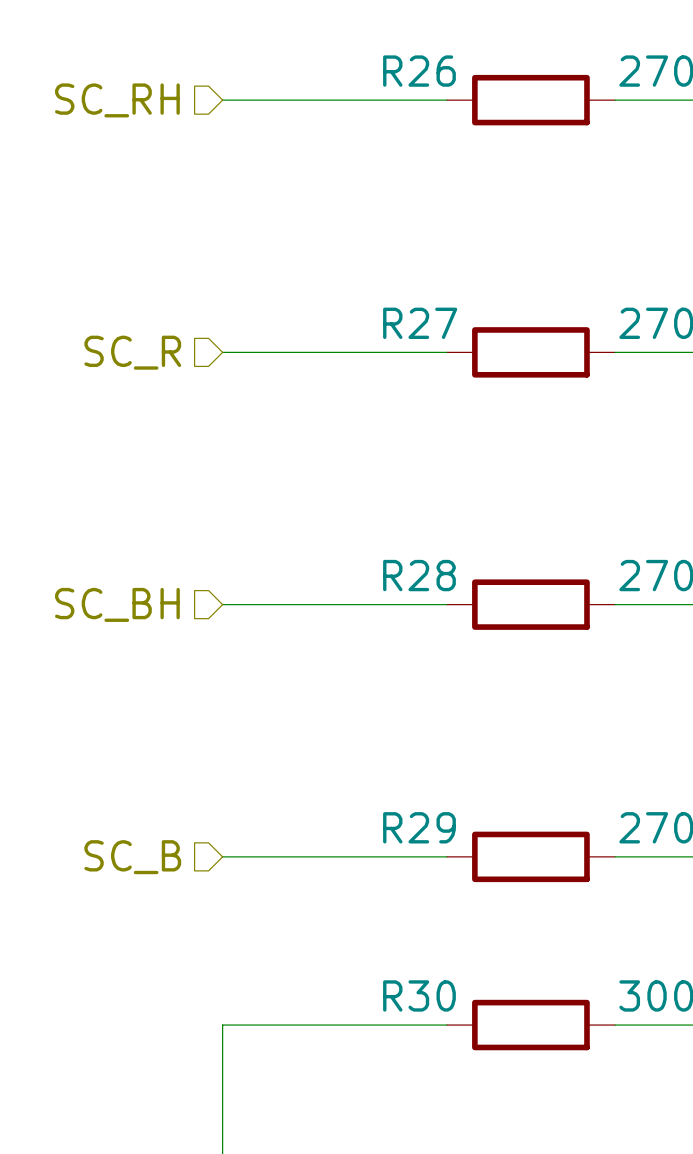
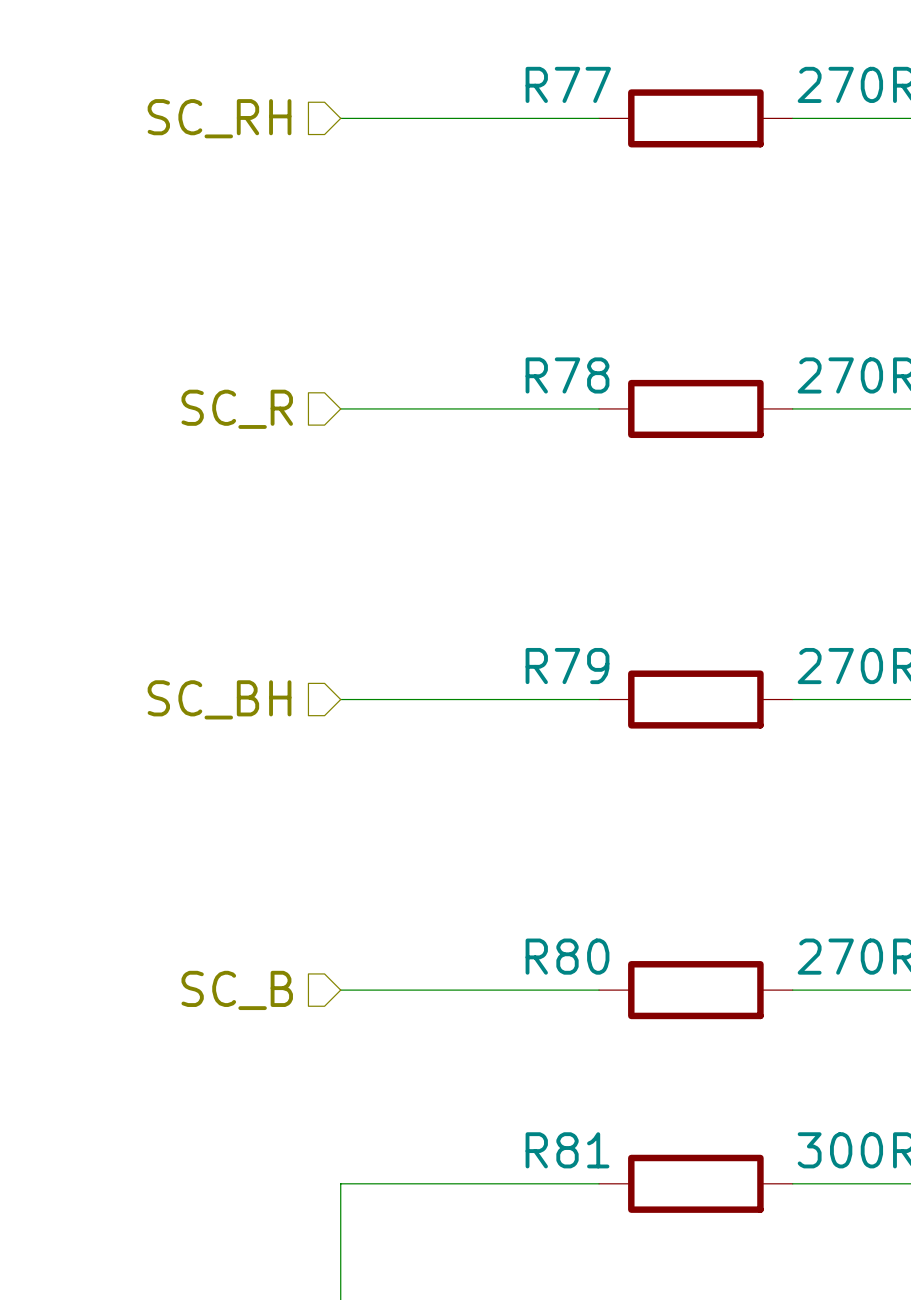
R26 name: R26 (419, 71) -> R77 (568, 84)
R27 name: R27 (420, 323) -> R78 (567, 375)
R28 name: R28 (419, 575) -> R79 (567, 666)
R29 name: R29 (419, 827) -> R80 (567, 956)
R30 name: R30 (419, 995) -> R81 (567, 1150)

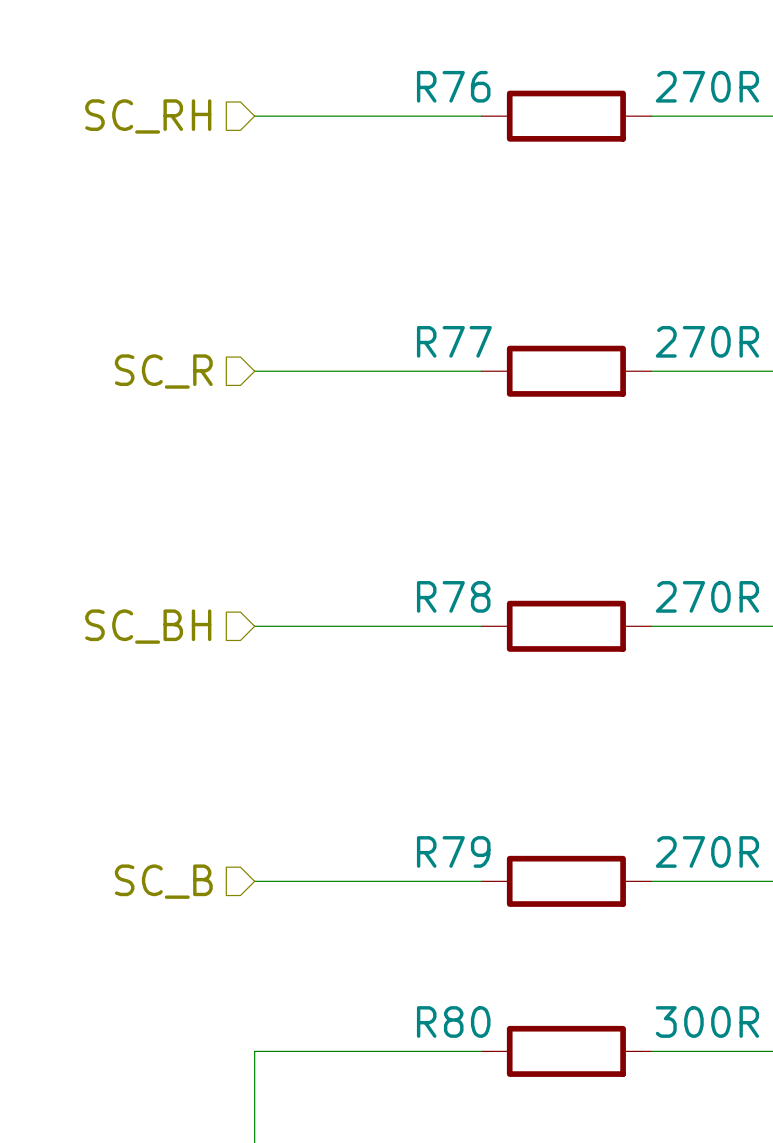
R77 name: R77 (568, 84) -> R76 (453, 86)
R78 name: R78 (567, 375) -> R77 (454, 341)
R79 name: R79 (567, 666) -> R78 (453, 596)
R80 name: R80 (567, 956) -> R79 (453, 851)
R81 name: R81 (567, 1150) -> R80 (453, 1022)

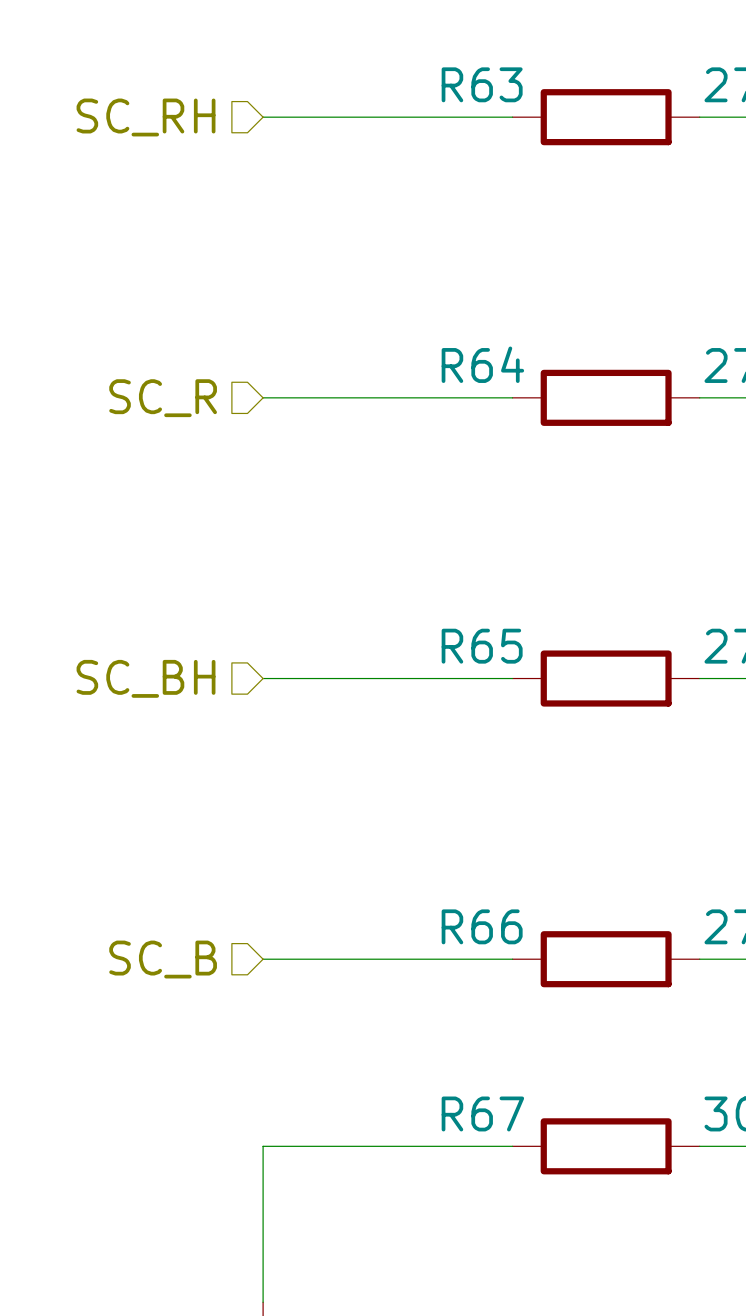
R76 name: R76 (453, 86) -> R63 (482, 84)
R77 name: R77 (454, 341) -> R64 (482, 364)
R78 name: R78 (453, 596) -> R65 (482, 646)
R79 name: R79 (453, 851) -> R66 (482, 926)
R80 name: R80 (453, 1022) -> R67 (482, 1113)

